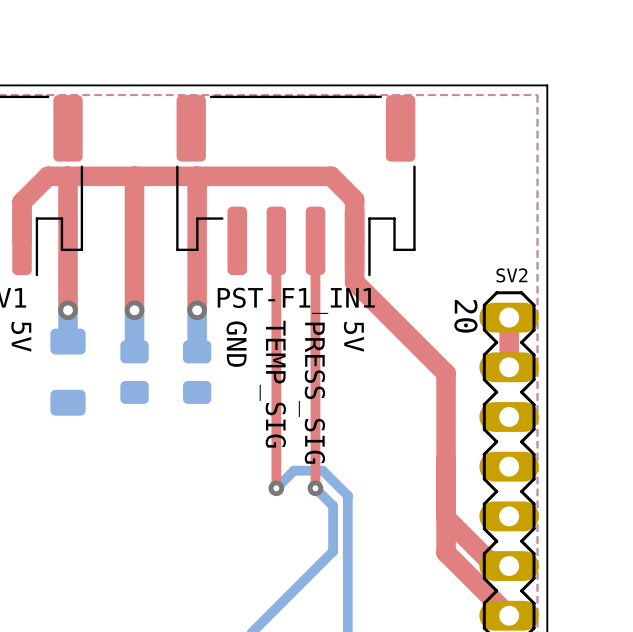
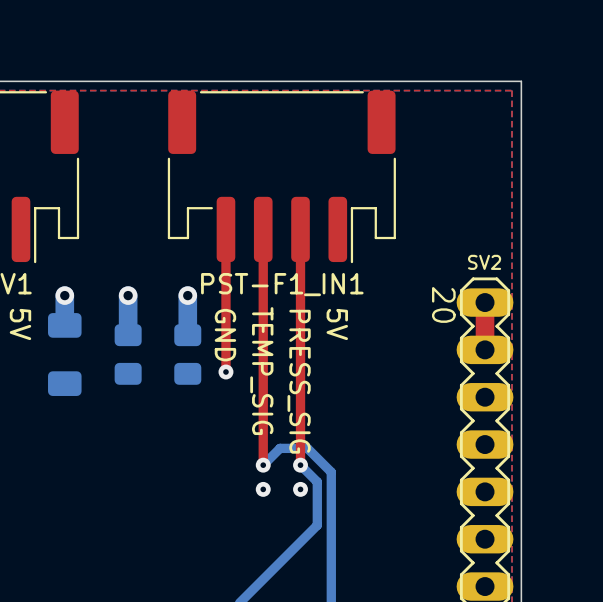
top track: (67, 176) (68, 310) -> none
top track: (134, 176) (134, 310) -> none
top track: (196, 176) (197, 310) -> none
top track: (22, 240) (22, 202) (47, 176) (331, 176) (354, 199) (354, 281) (446, 373) (446, 552) (509, 615) -> none
top track: none -> (225, 229) (225, 371)
via: none -> (225, 371)
via: none -> (263, 489)
via: none -> (300, 489)
top track: (446, 517) (494, 566) (509, 566) -> none

